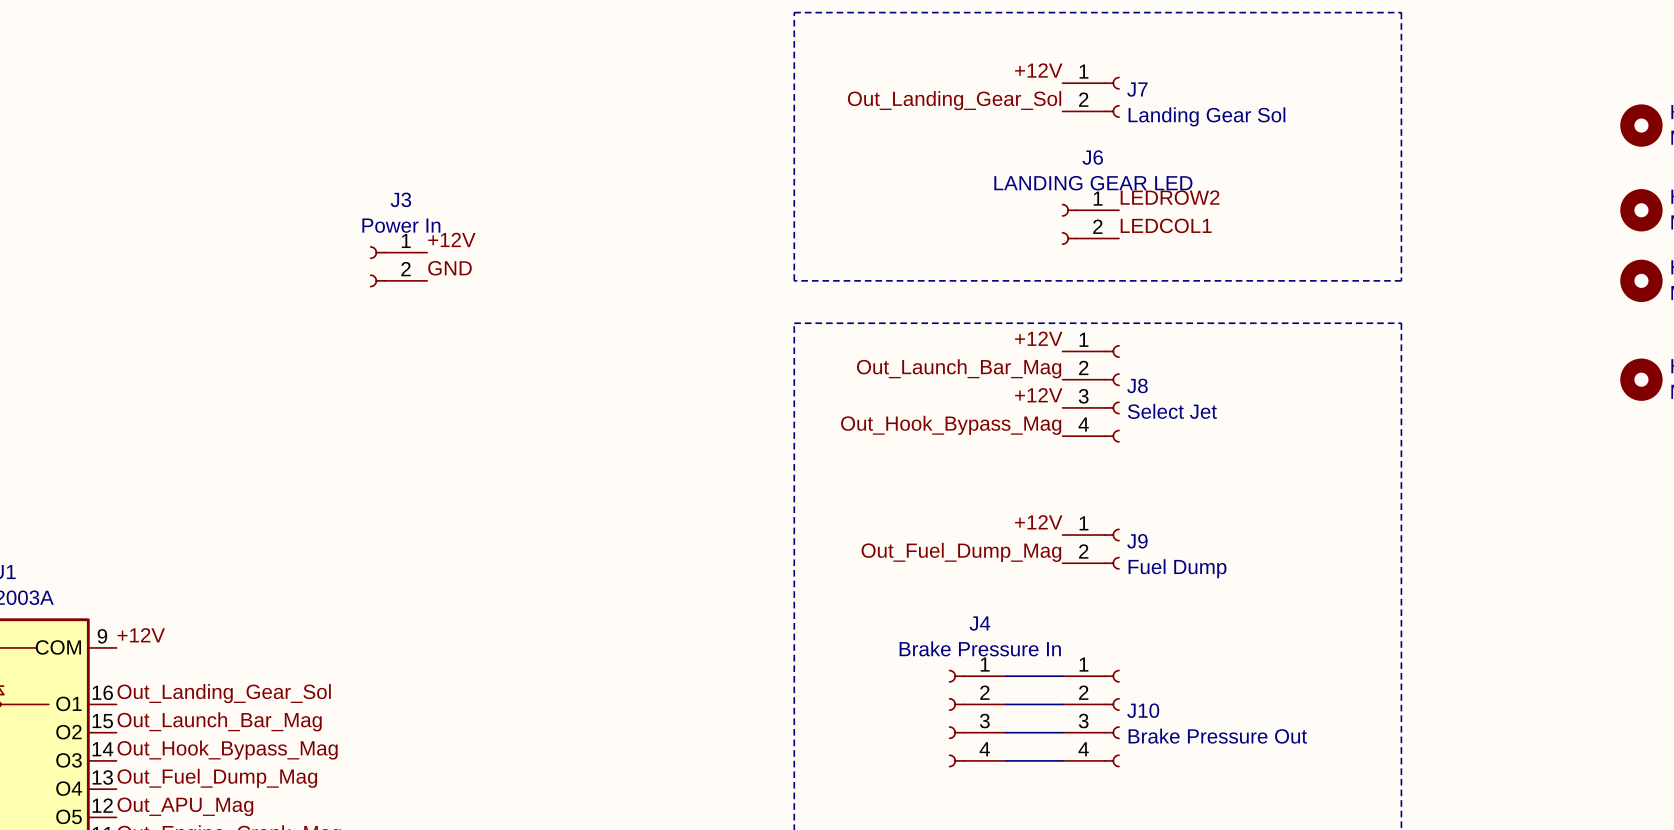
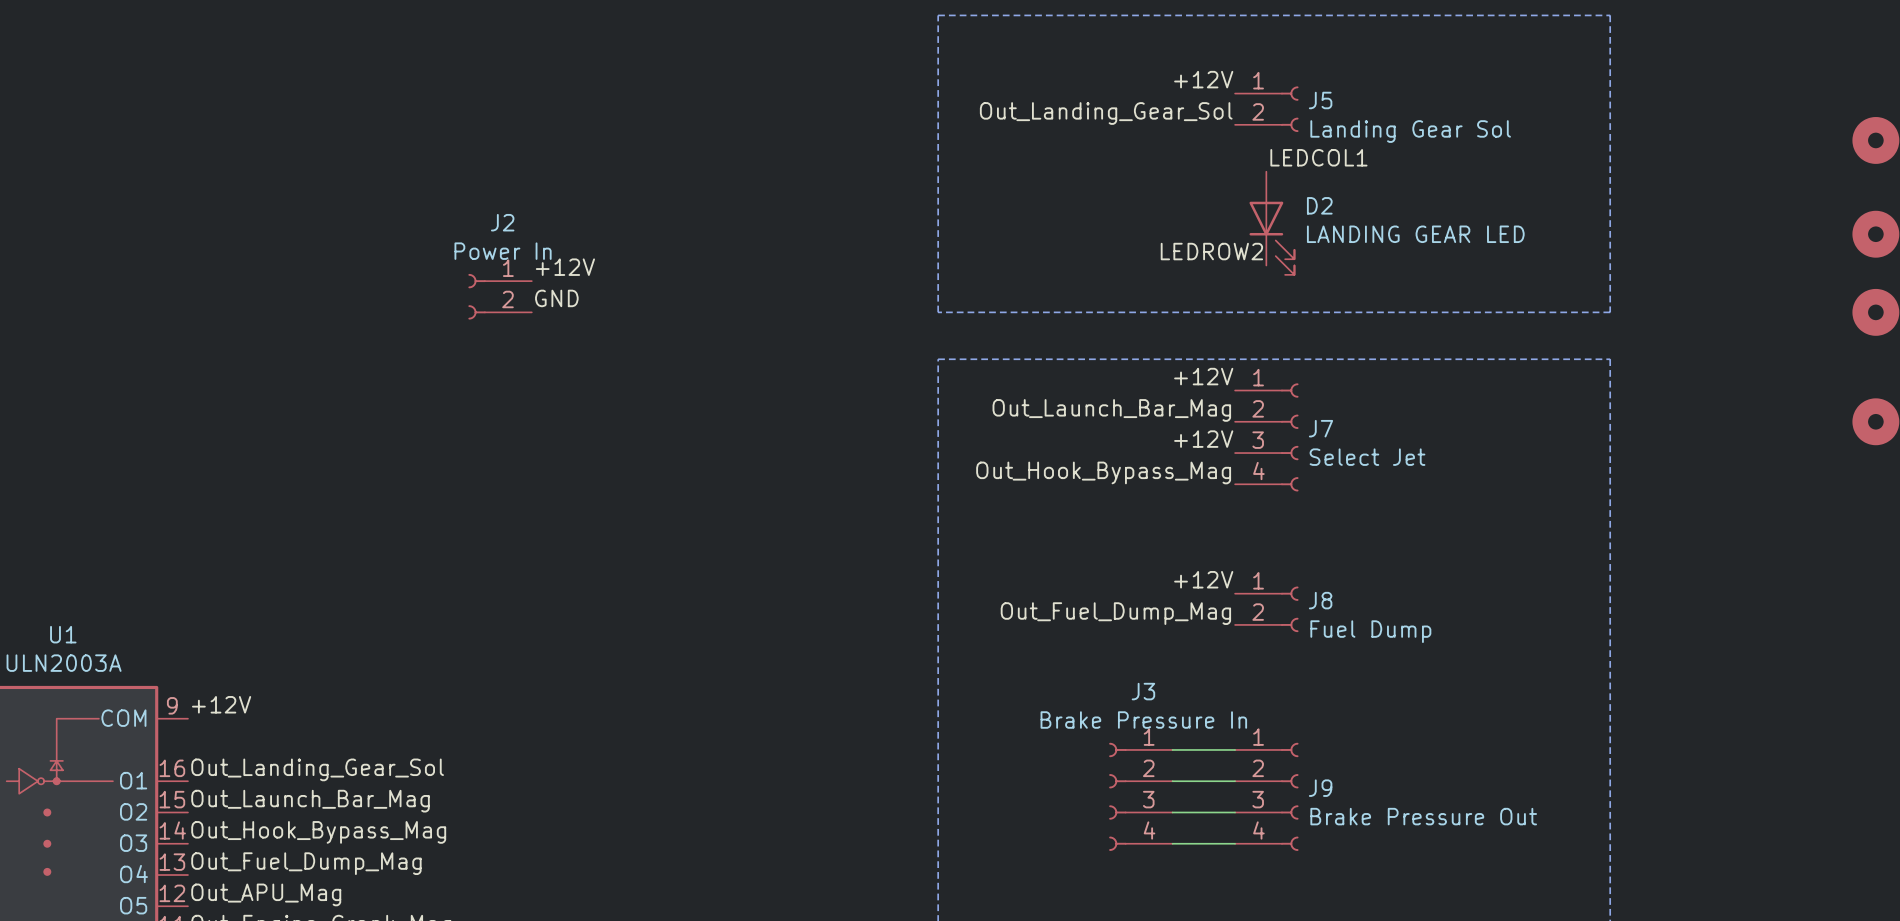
J7 name: J7 (1137, 89) -> J5 (1320, 100)
label position: LEDROW2 (1170, 197) -> LEDROW2 (1211, 251)
J3 name: J3 (400, 199) -> J2 (502, 222)
D2: none -> LANDING GEAR LED (1271, 223)
J6: LANDING GEAR LED (1090, 224) -> none
label position: LEDCOL1 (1166, 225) -> LEDCOL1 (1318, 157)
J8 name: J8 (1137, 385) -> J7 (1320, 428)
J9 name: J9 (1137, 541) -> J8 (1320, 600)
J4 name: J4 (979, 623) -> J3 (1143, 691)
J10 name: J10 (1143, 710) -> J9 (1320, 788)

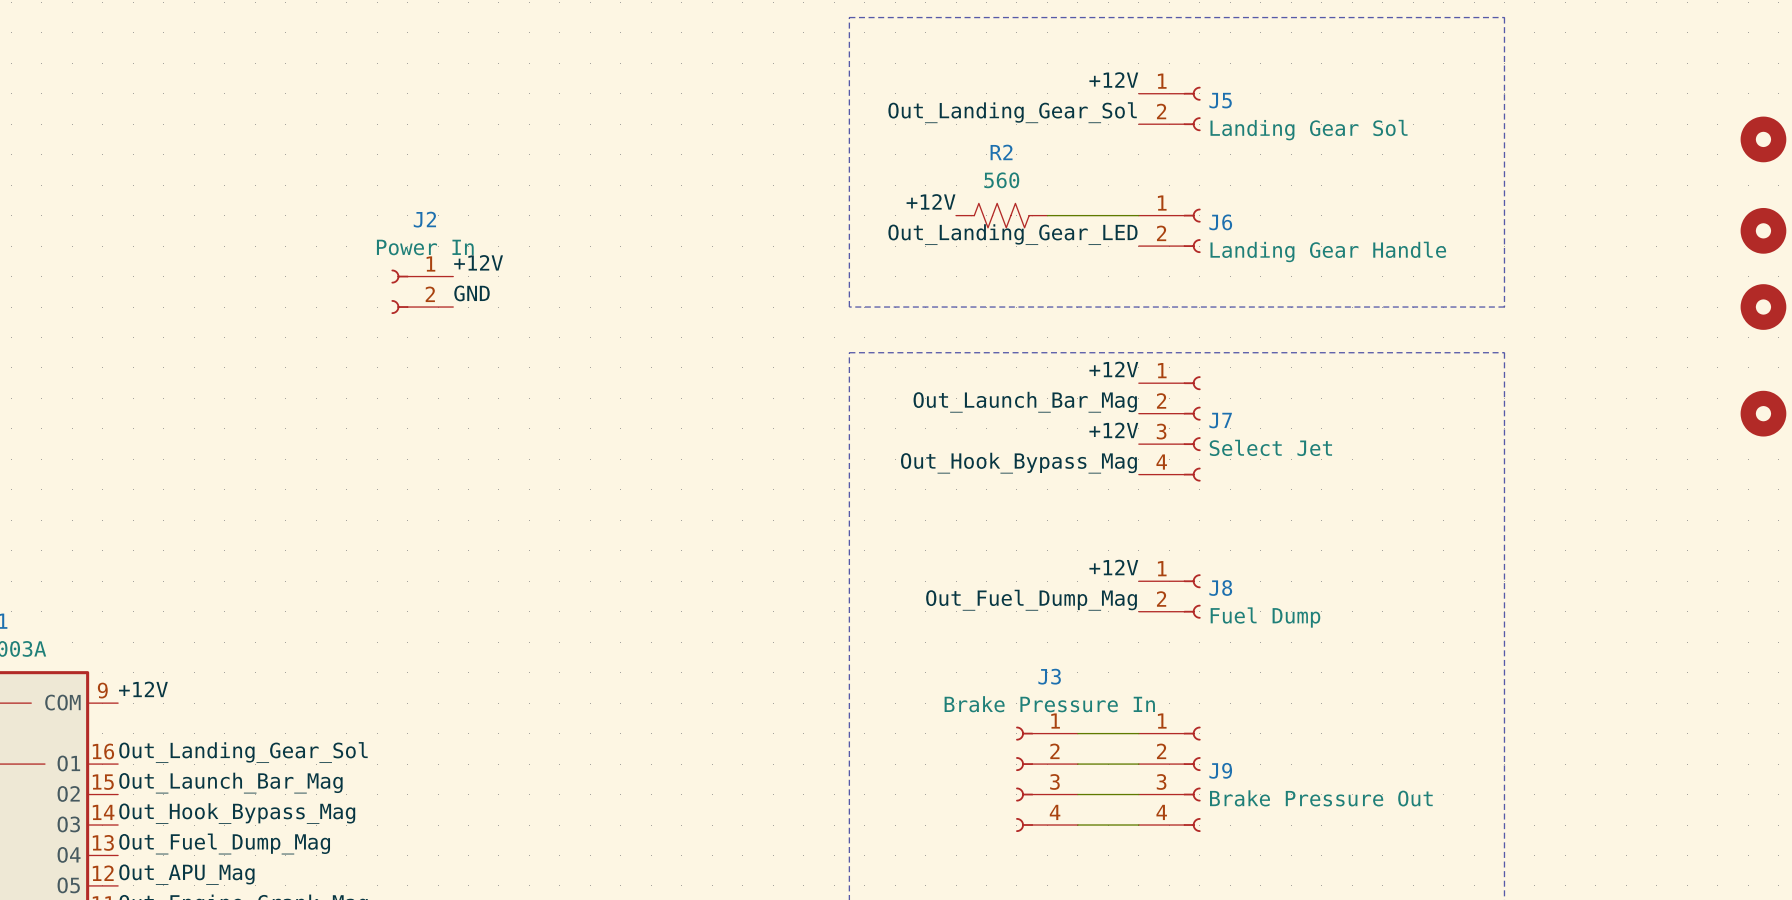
label: LEDCOL1 (1318, 157) -> none
label: none -> +12V (931, 201)
R2: none -> 560 (1001, 215)
wire: none -> (1047, 215) (1138, 215)
D2: LANDING GEAR LED (1271, 223) -> none
J6: none -> Landing Gear Handle (1169, 230)
label: none -> Out_Landing_Gear_LED (1012, 234)
label: LEDROW2 (1211, 251) -> none

